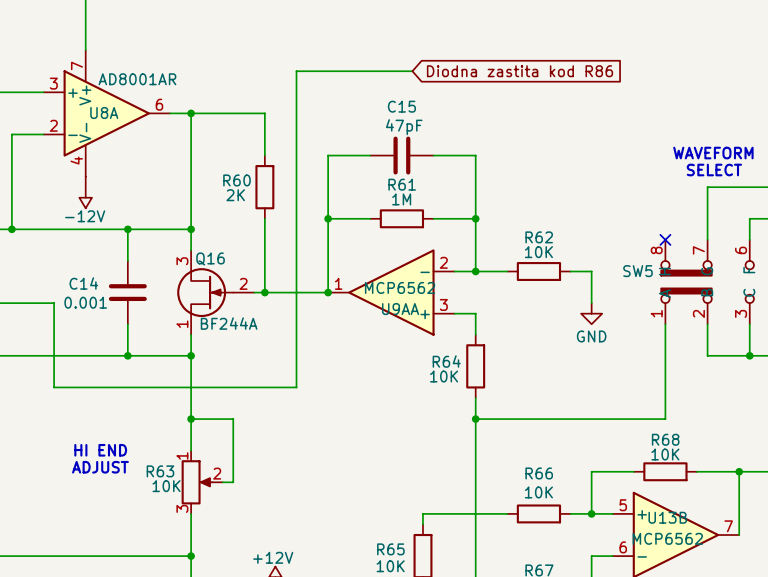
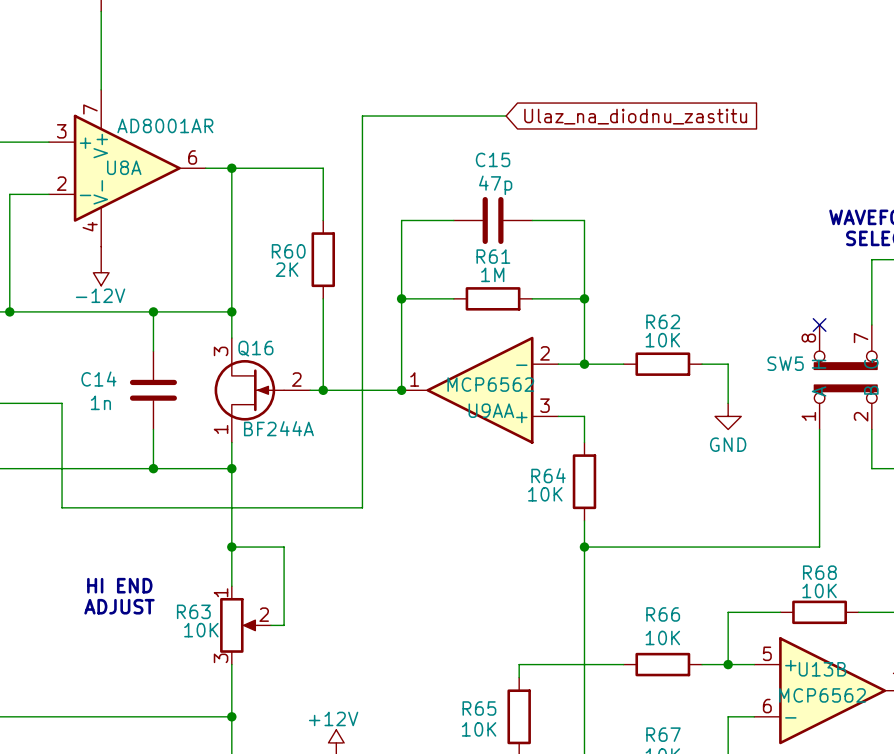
global label: Diodna zastita kod R86 (520, 71) -> Ulaz_na_diodnu_zastitu (635, 116)
C15 value: 47pF (404, 127) -> 47p (495, 185)
C14 value: 0.001 (85, 302) -> 1n (100, 402)

